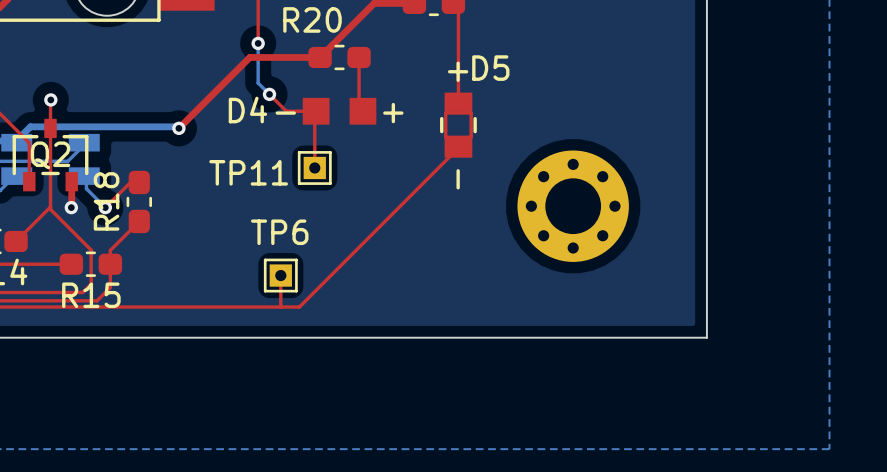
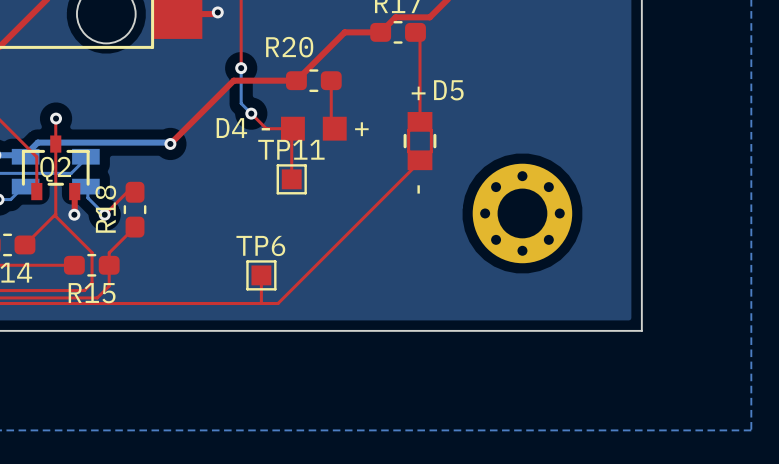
TP11 footprint: [297, 151, 332, 185] -> [276, 164, 307, 195]
TP11 name position: TP11 (248, 172) -> TP11 (291, 149)
TP6 footprint: [263, 258, 298, 293] -> [246, 260, 277, 291]

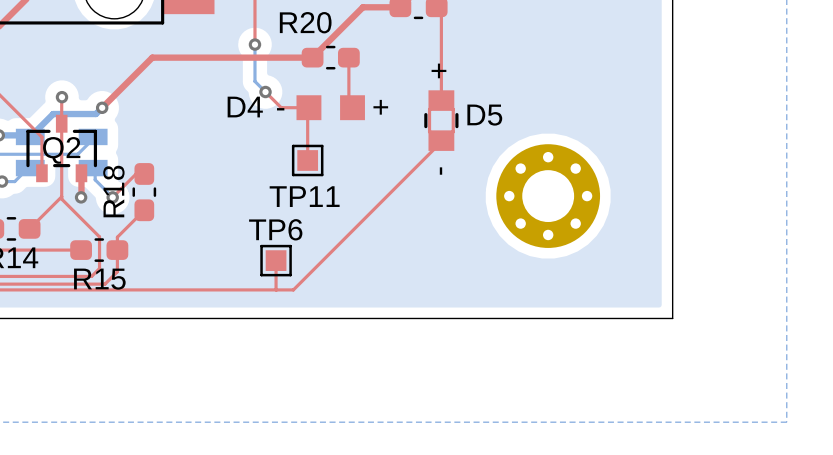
top track: (233, 80) (170, 143) -> (247, 57) (152, 57) (102, 107)
D5 name position: D5 (448, 90) -> D5 (484, 115)
bottom track: none -> (102, 107) (95, 114) (53, 114) (30, 136)
bottom track: (170, 143) (37, 142) (23, 156) -> none
via position: (170, 143) -> (102, 107)
TP11 name position: TP11 (291, 149) -> TP11 (304, 196)

